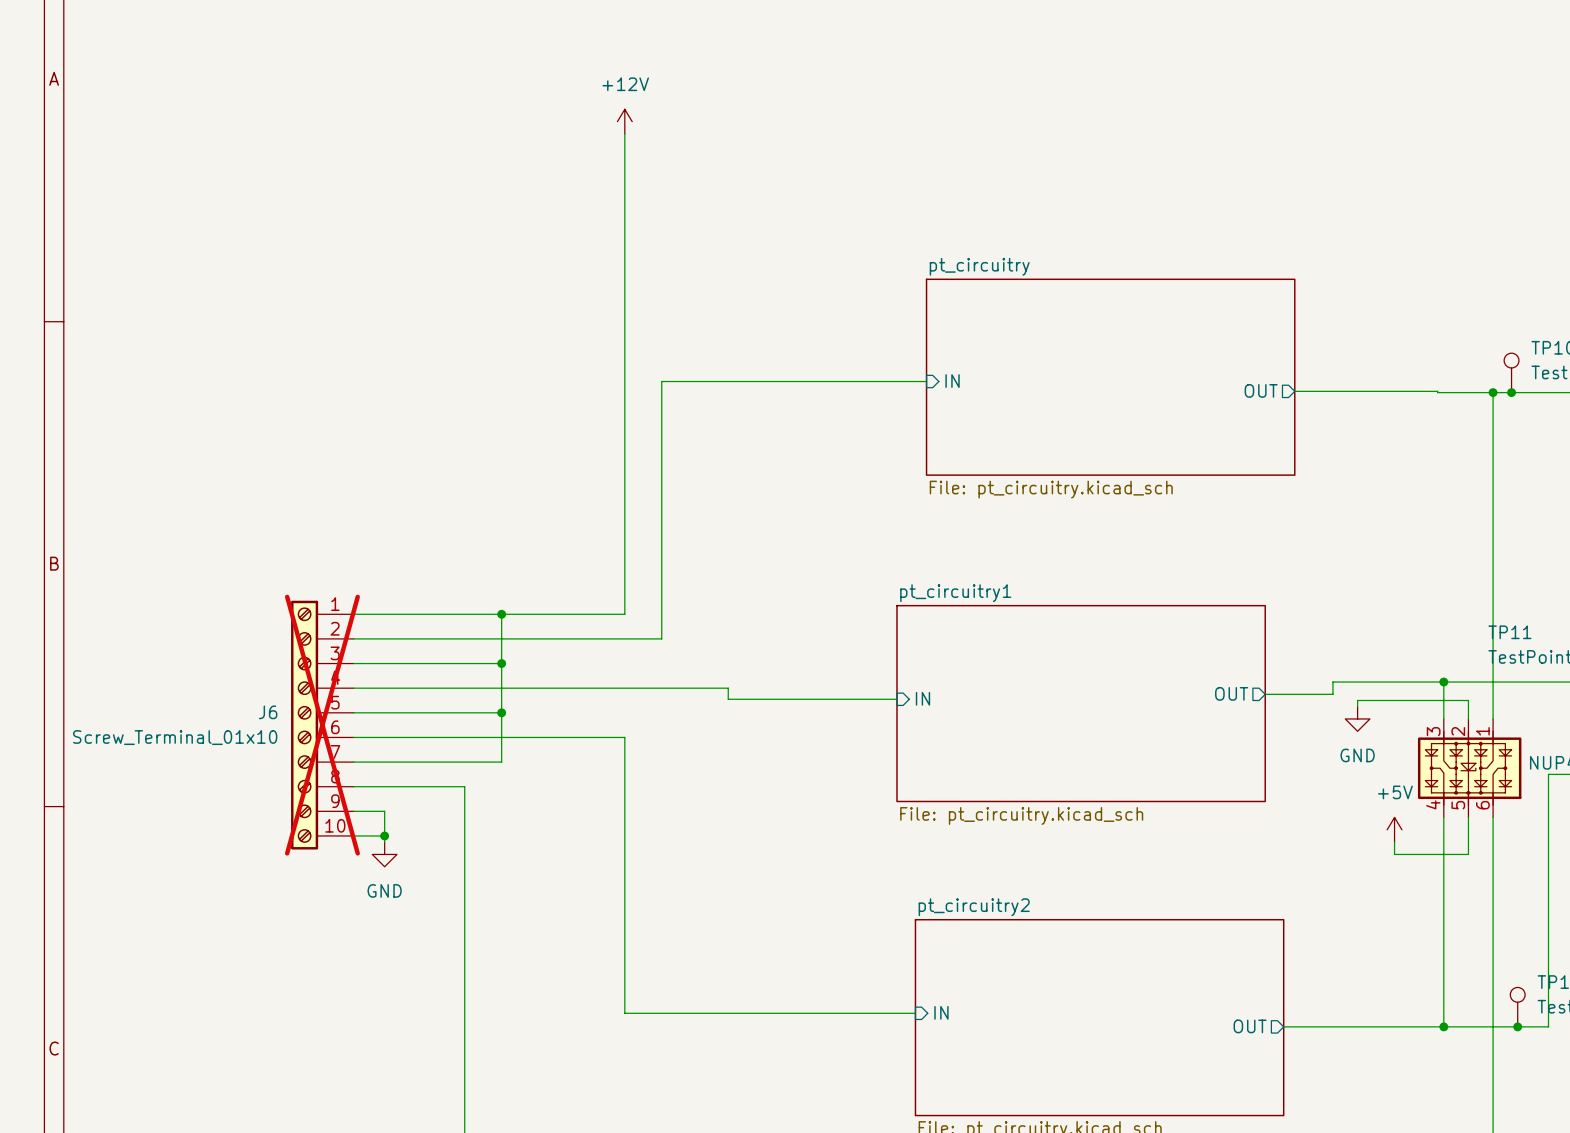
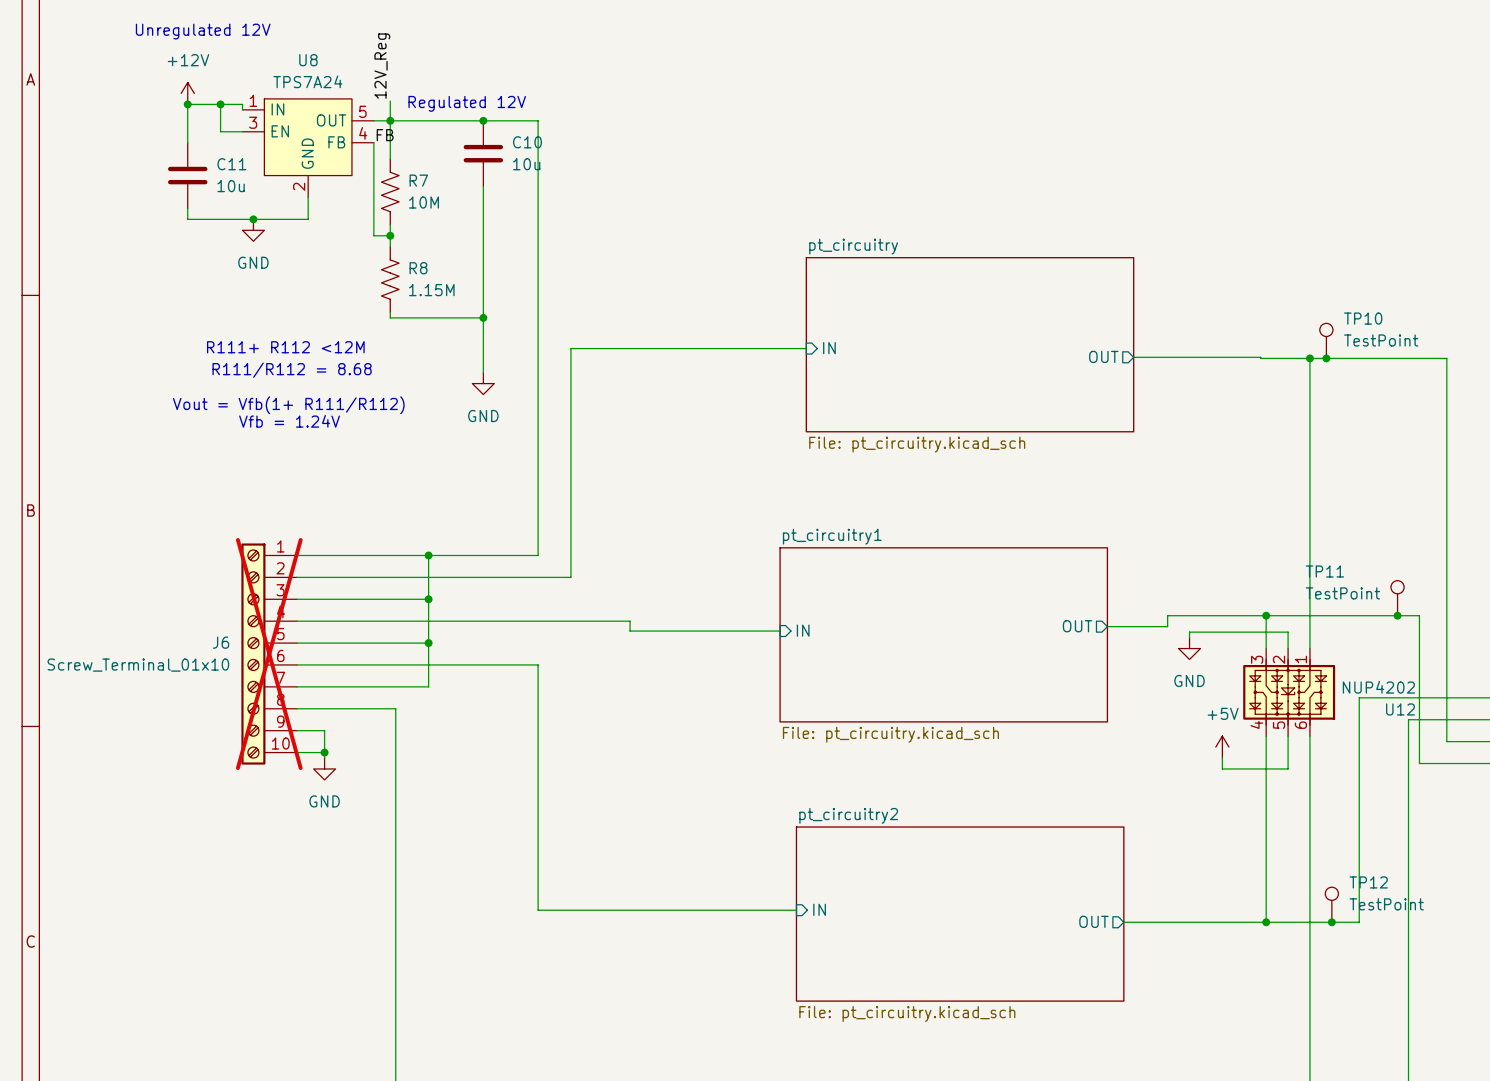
text: none -> Unregulated 12V (203, 31)
label: none -> 12V_Reg (382, 66)
power symbol: none -> +12V (187, 93)
wire: none -> (390, 101) (390, 159)
junction: none -> (187, 104)
wire: none -> (220, 104) (220, 131) (242, 131)
junction: none -> (220, 104)
text: none -> Regulated 12V (467, 103)
wire: none -> (242, 109) (242, 104) (187, 104) (187, 142)
power symbol: +12V (624, 121) -> none
wire: none -> (373, 120) (538, 120) (538, 128)
junction: none -> (390, 120)
junction: none -> (483, 120)
label: none -> FB (385, 135)
wire: none -> (373, 142) (373, 235) (390, 235)
U8: none -> TPS7A24 (308, 148)
C10: none -> 10u (483, 153)
C11: none -> 10u (187, 175)
wire: none -> (483, 186) (483, 372)
R7: none -> 10M (390, 191)
wire: none -> (308, 197) (308, 219) (187, 219) (187, 208)
junction: none -> (253, 219)
wire: none -> (390, 224) (390, 246)
power symbol: none -> GND (253, 230)
junction: none -> (390, 235)
R8: none -> 1.15M (390, 279)
wire: none -> (390, 312) (390, 317) (483, 317)
junction: none -> (483, 317)
text: none -> R111+ R112 <12M (285, 347)
text: none -> R111/R112 = 8.68 (292, 370)
power symbol: none -> GND (483, 383)
text: none -> Vout = Vfb(1+ R111/R112) (288, 405)
text: none -> Vfb = 1.24V (289, 421)

